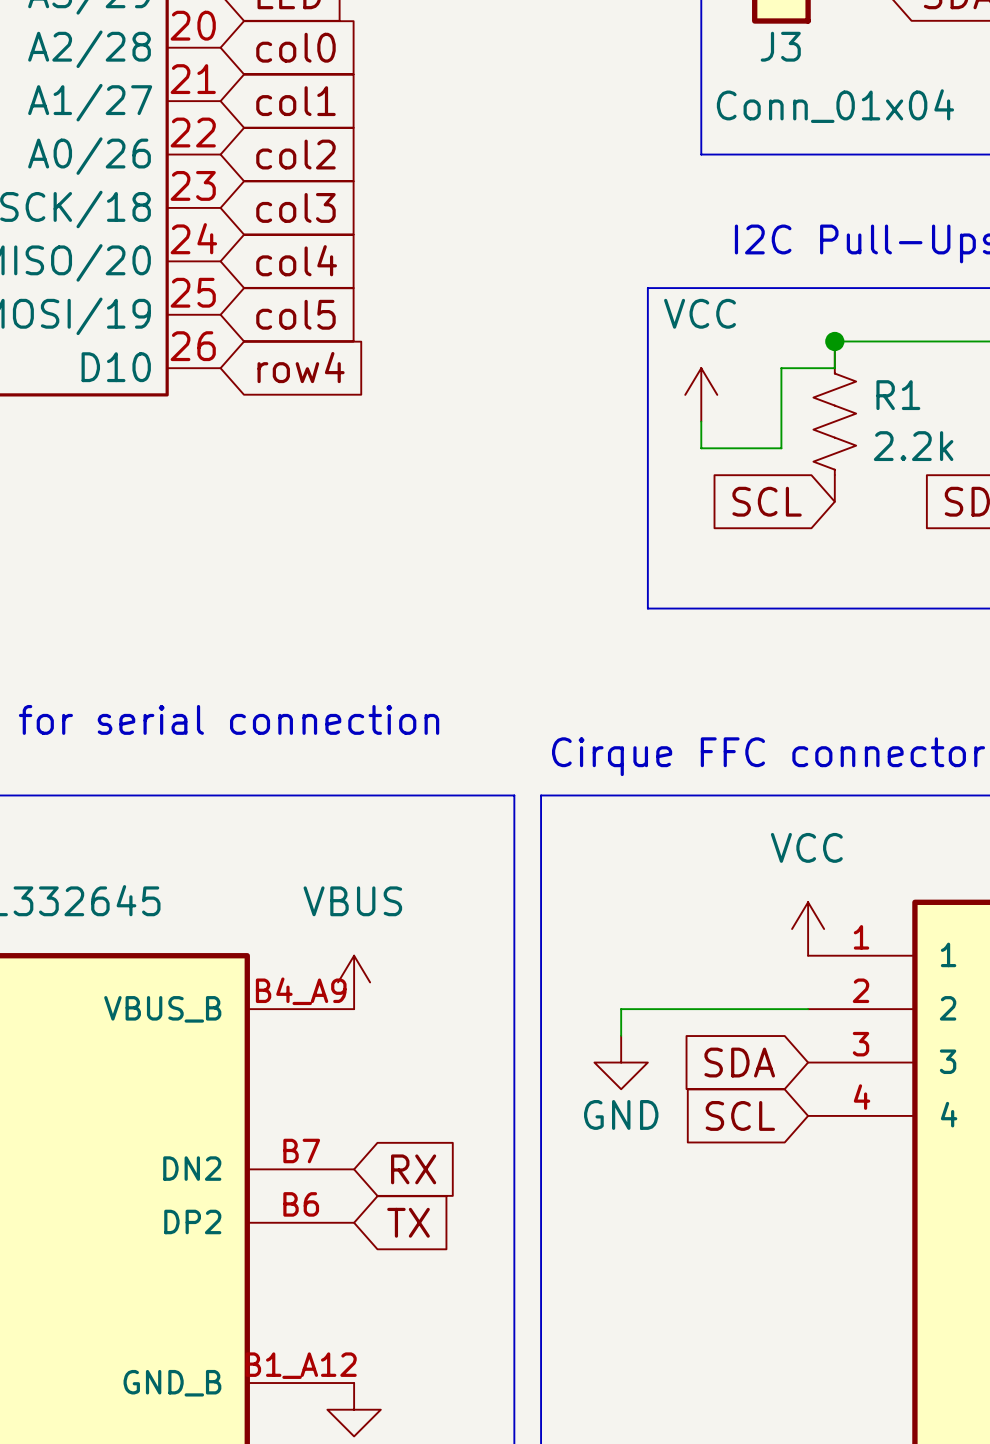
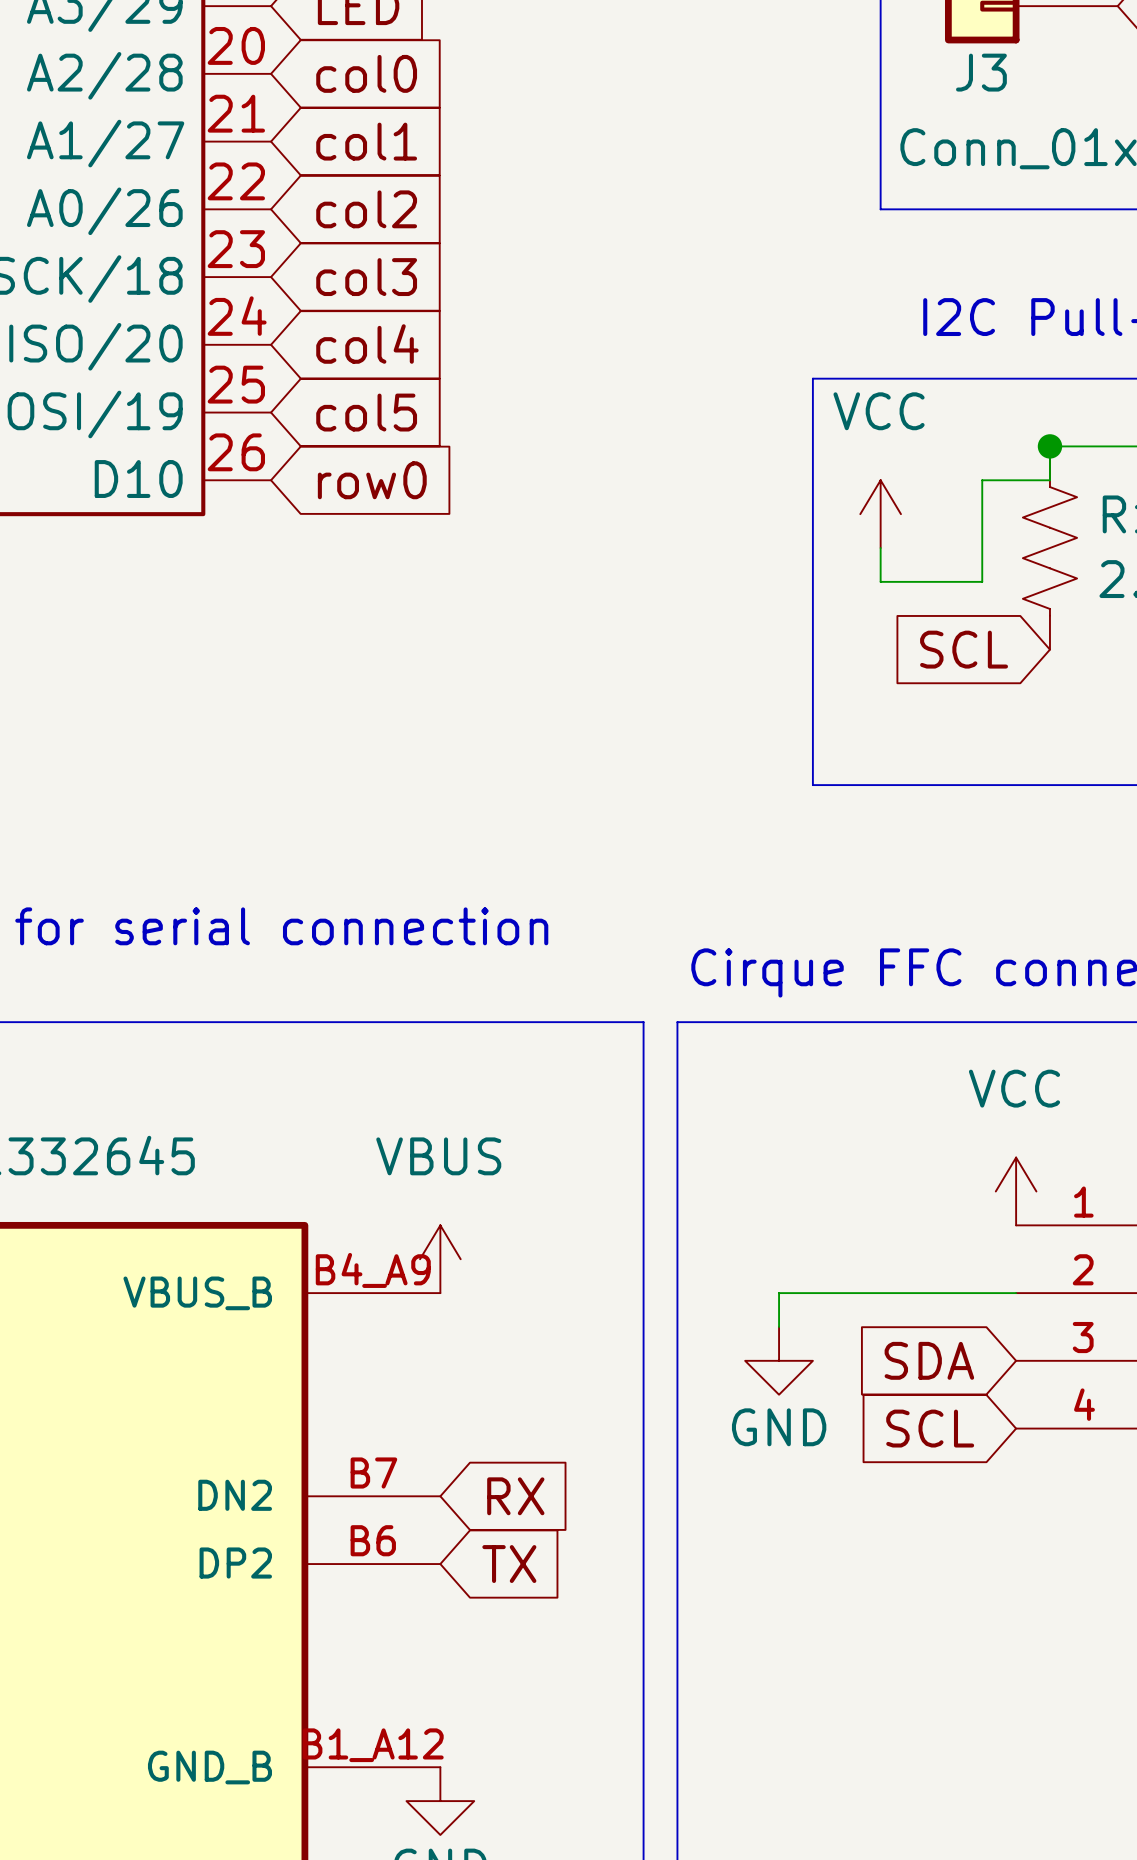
global label: row4 (301, 367) -> row0 (372, 480)

